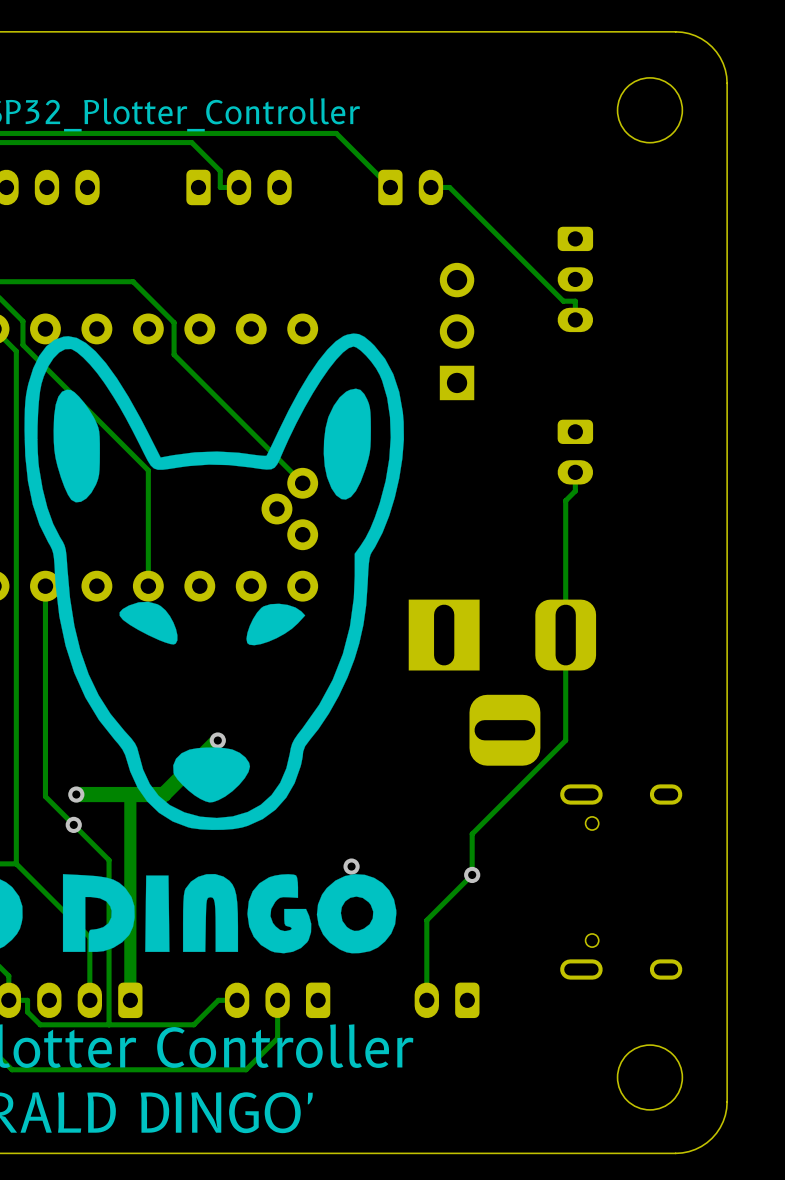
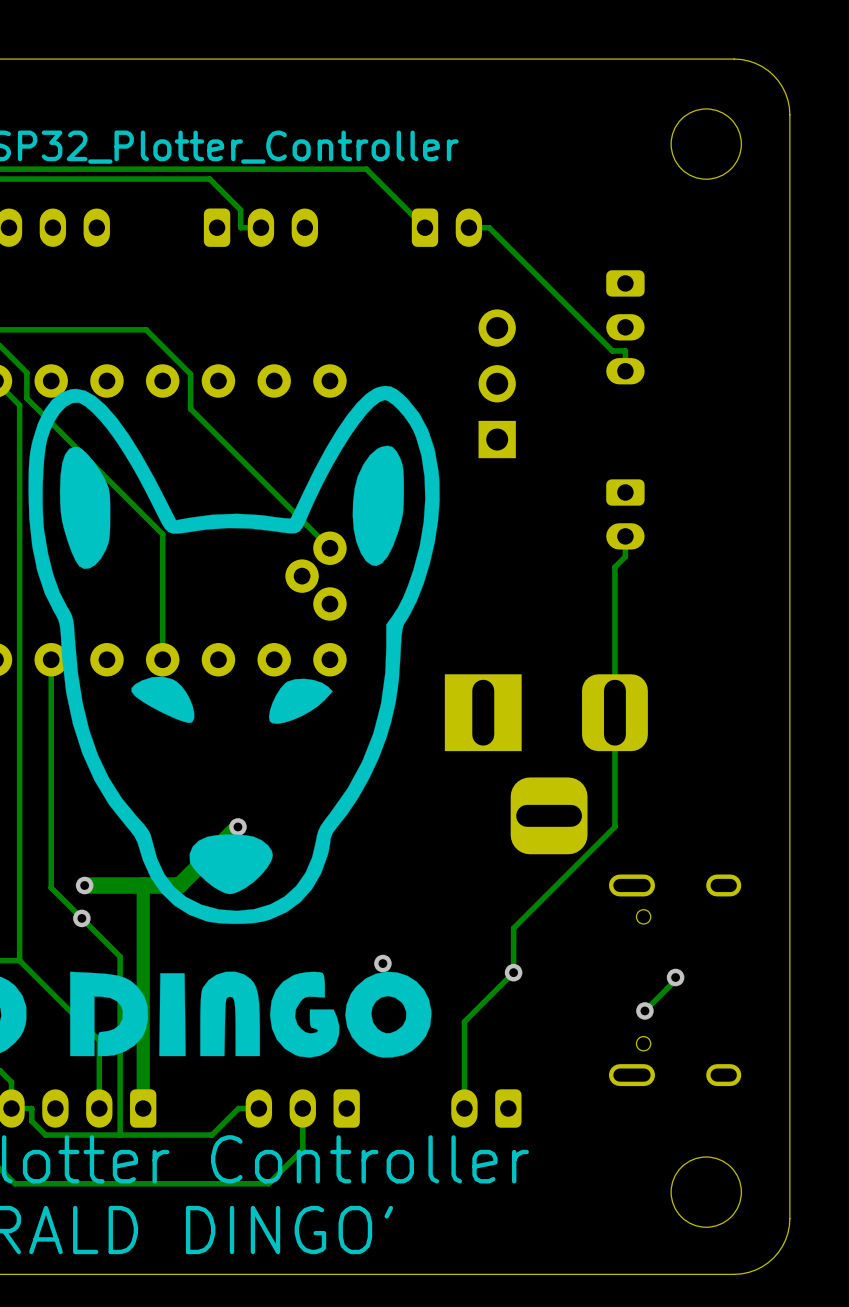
track: none -> (675, 977) (675, 980) (644, 1010)
via: none -> (675, 977)
via: none -> (644, 1010)

